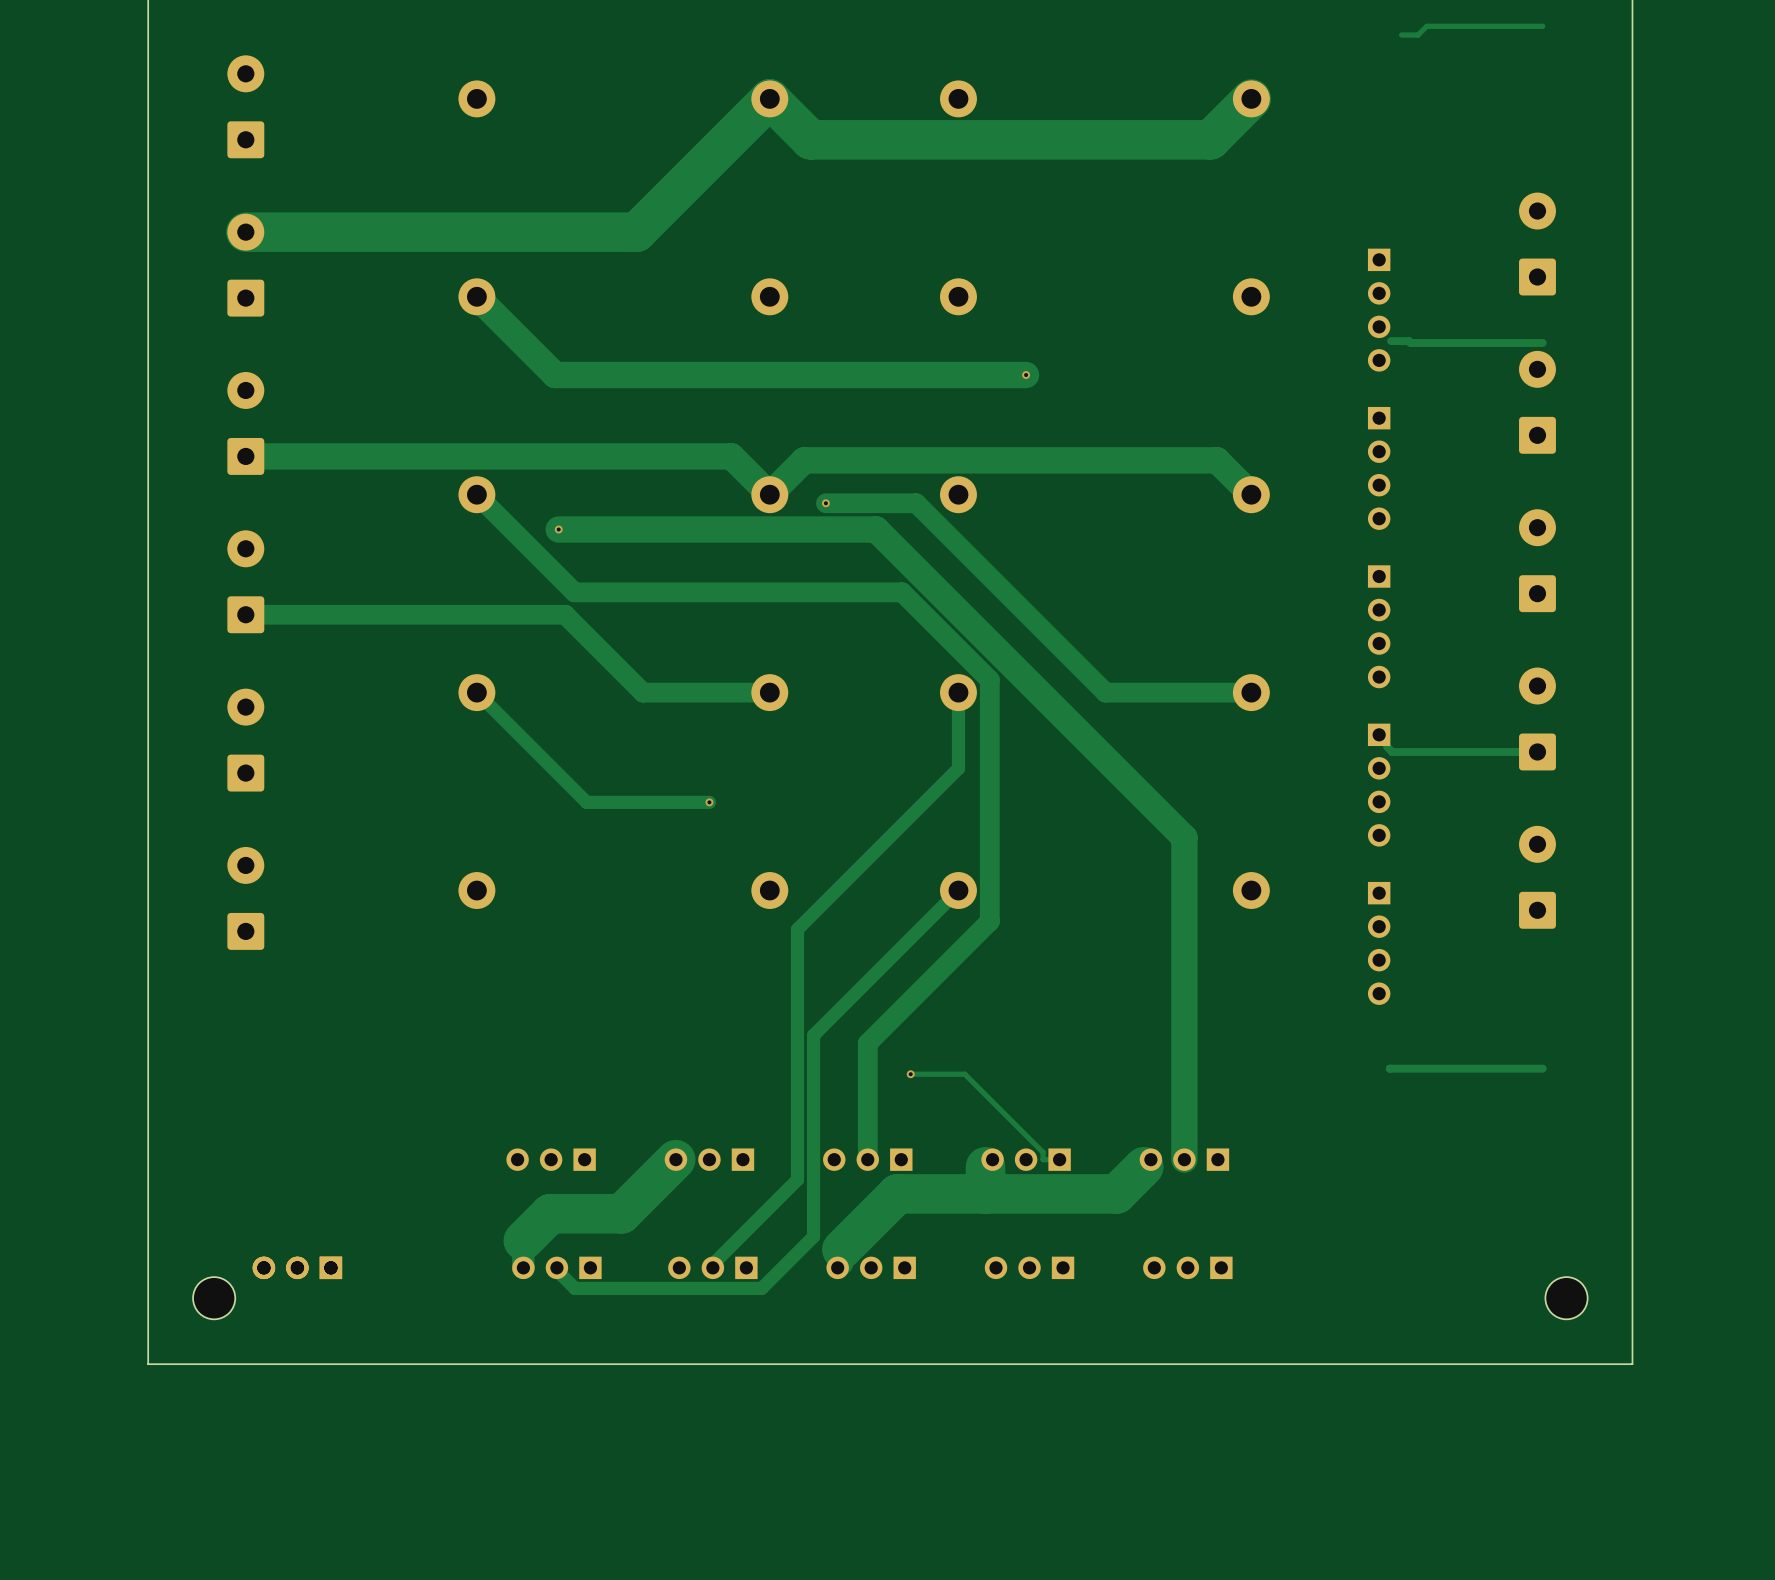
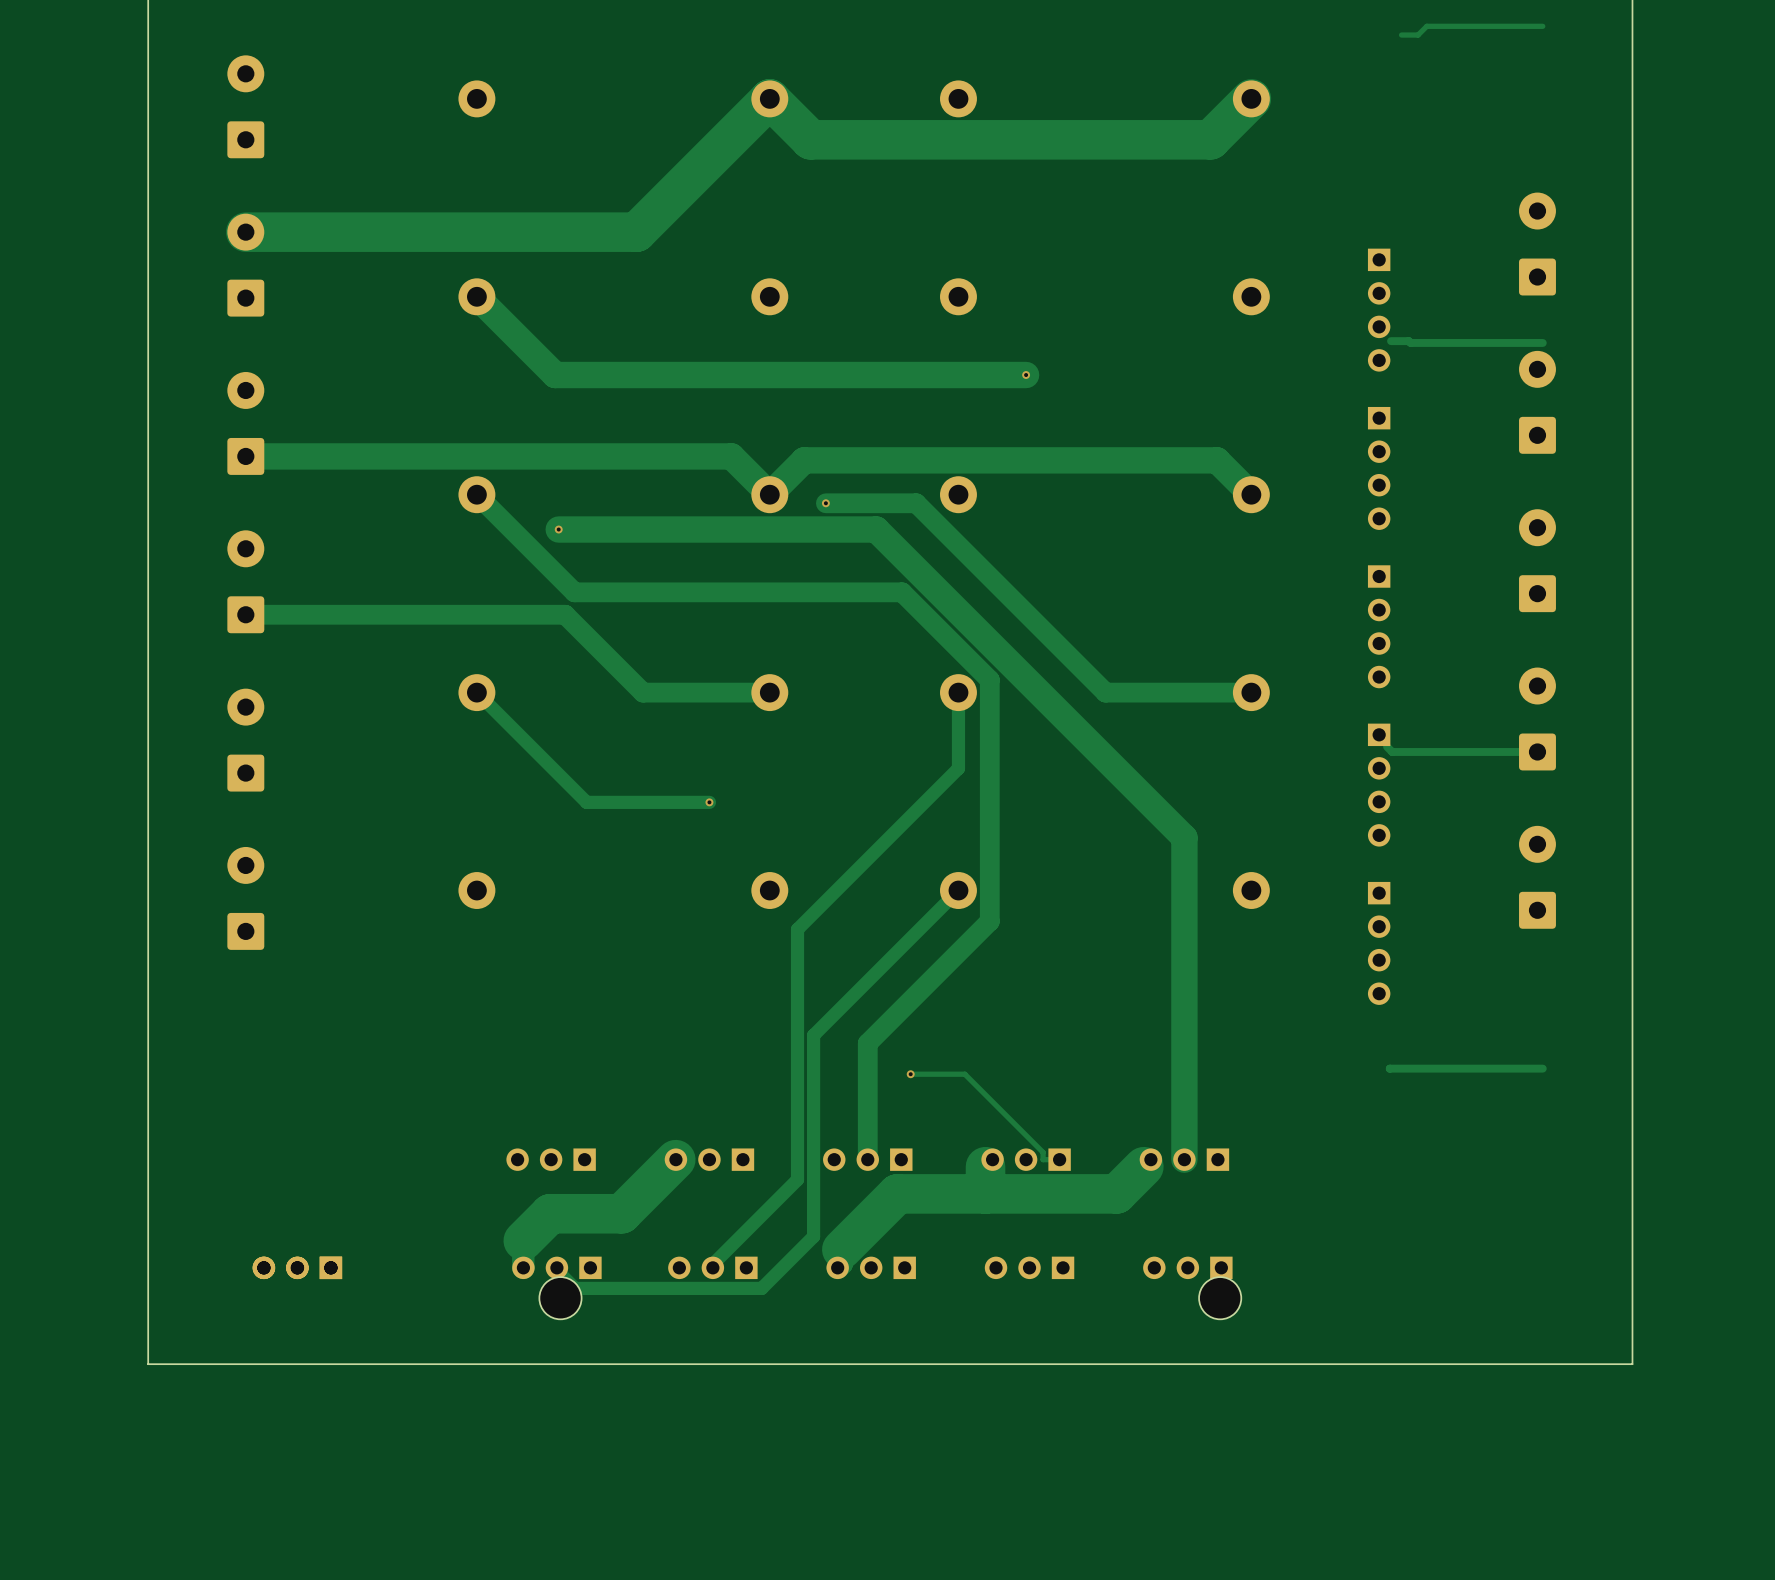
part: (214, 1298) -> none
part: none -> (560, 1298)
part: none -> (1220, 1298)
part: (1566, 1298) -> none

